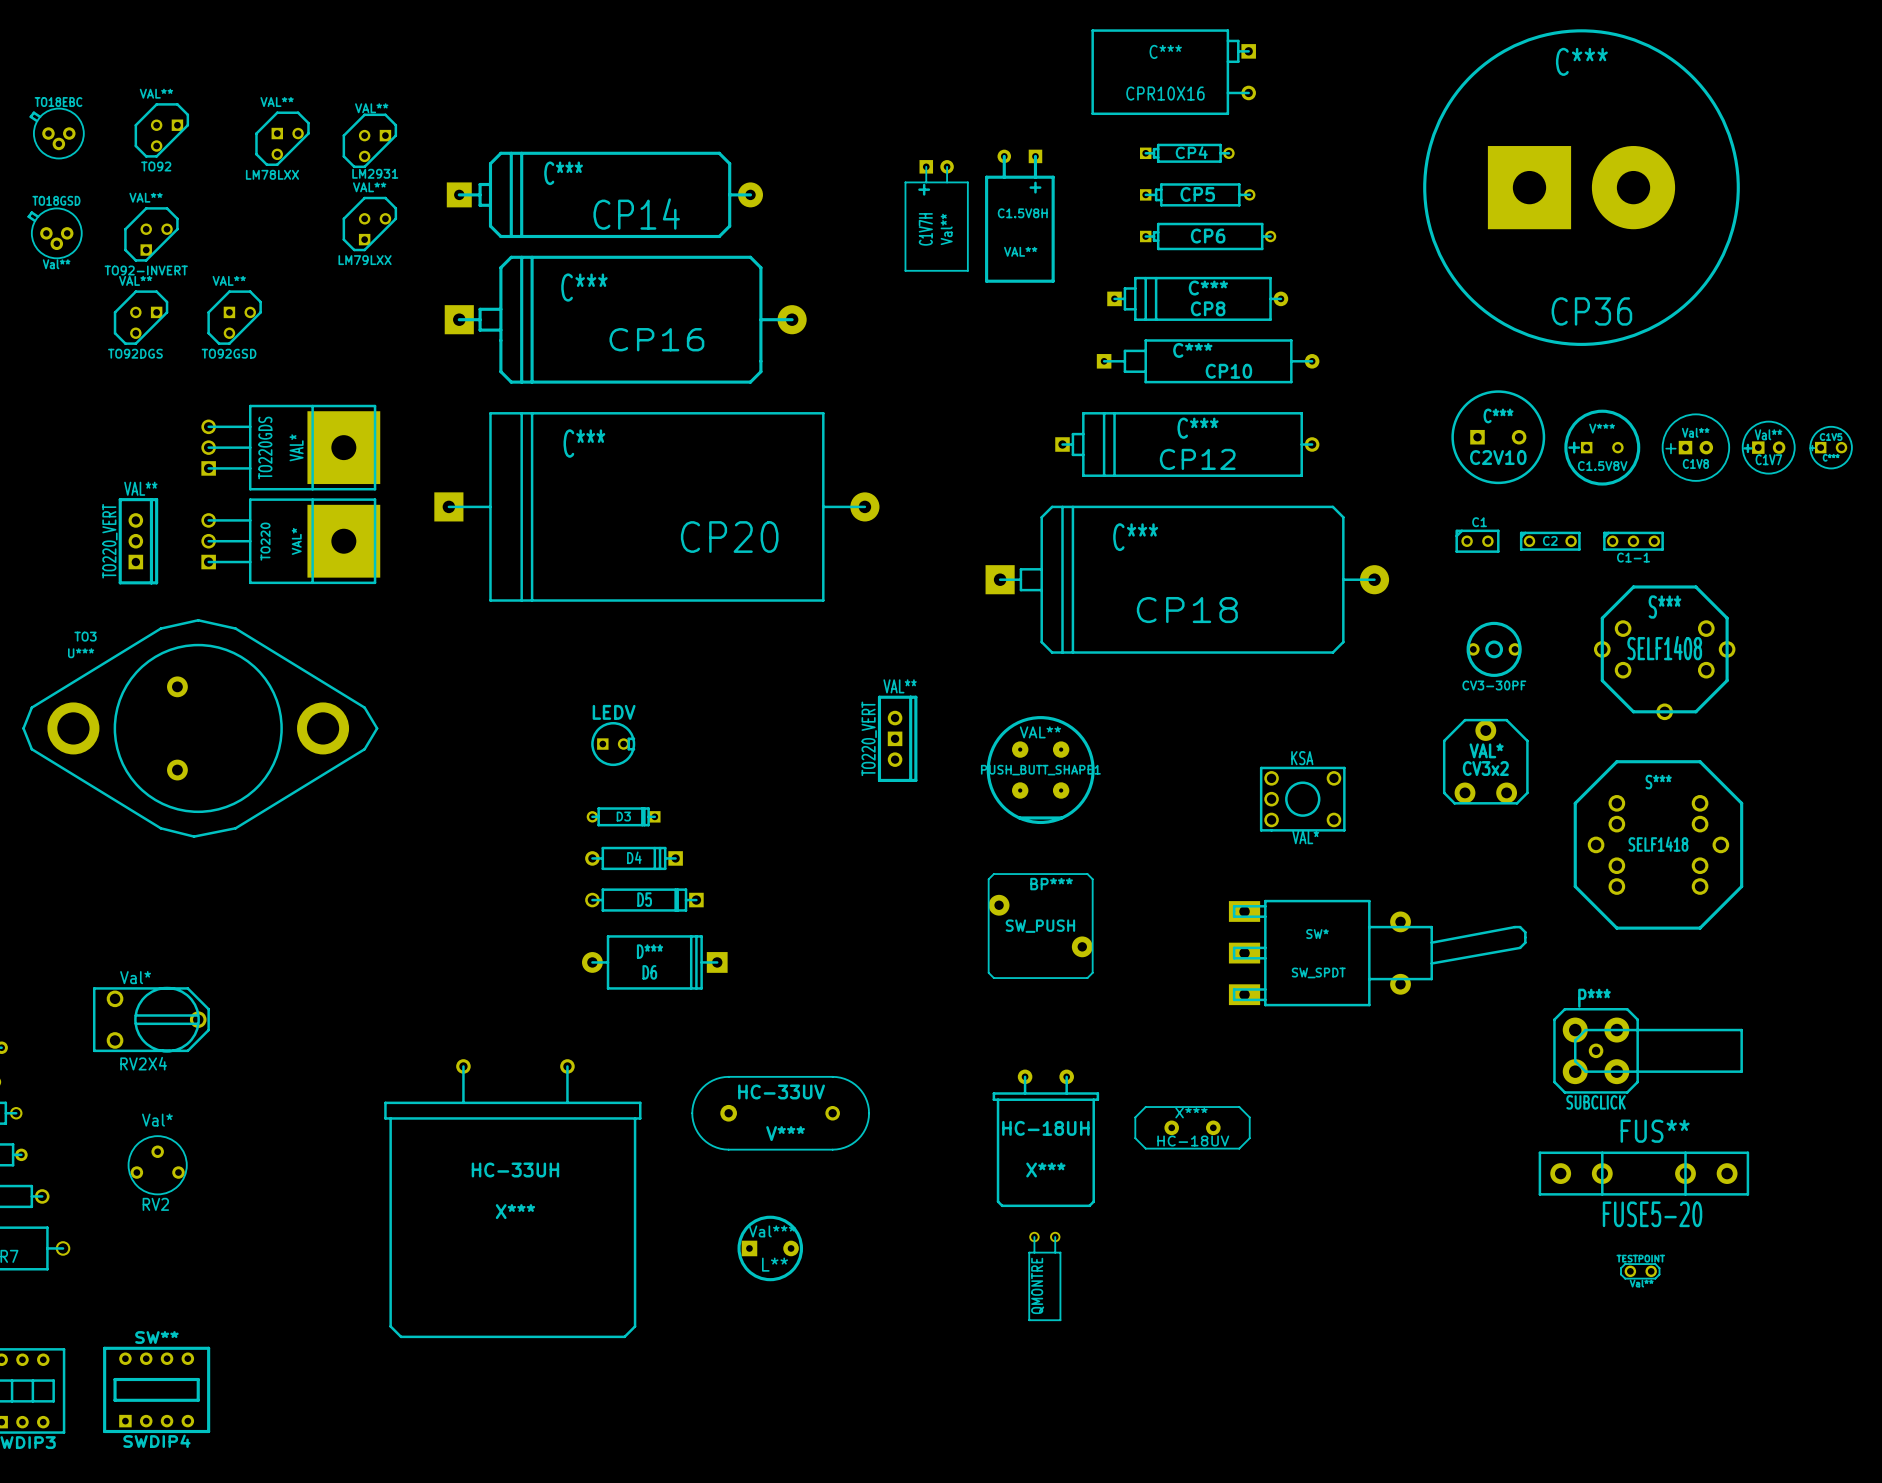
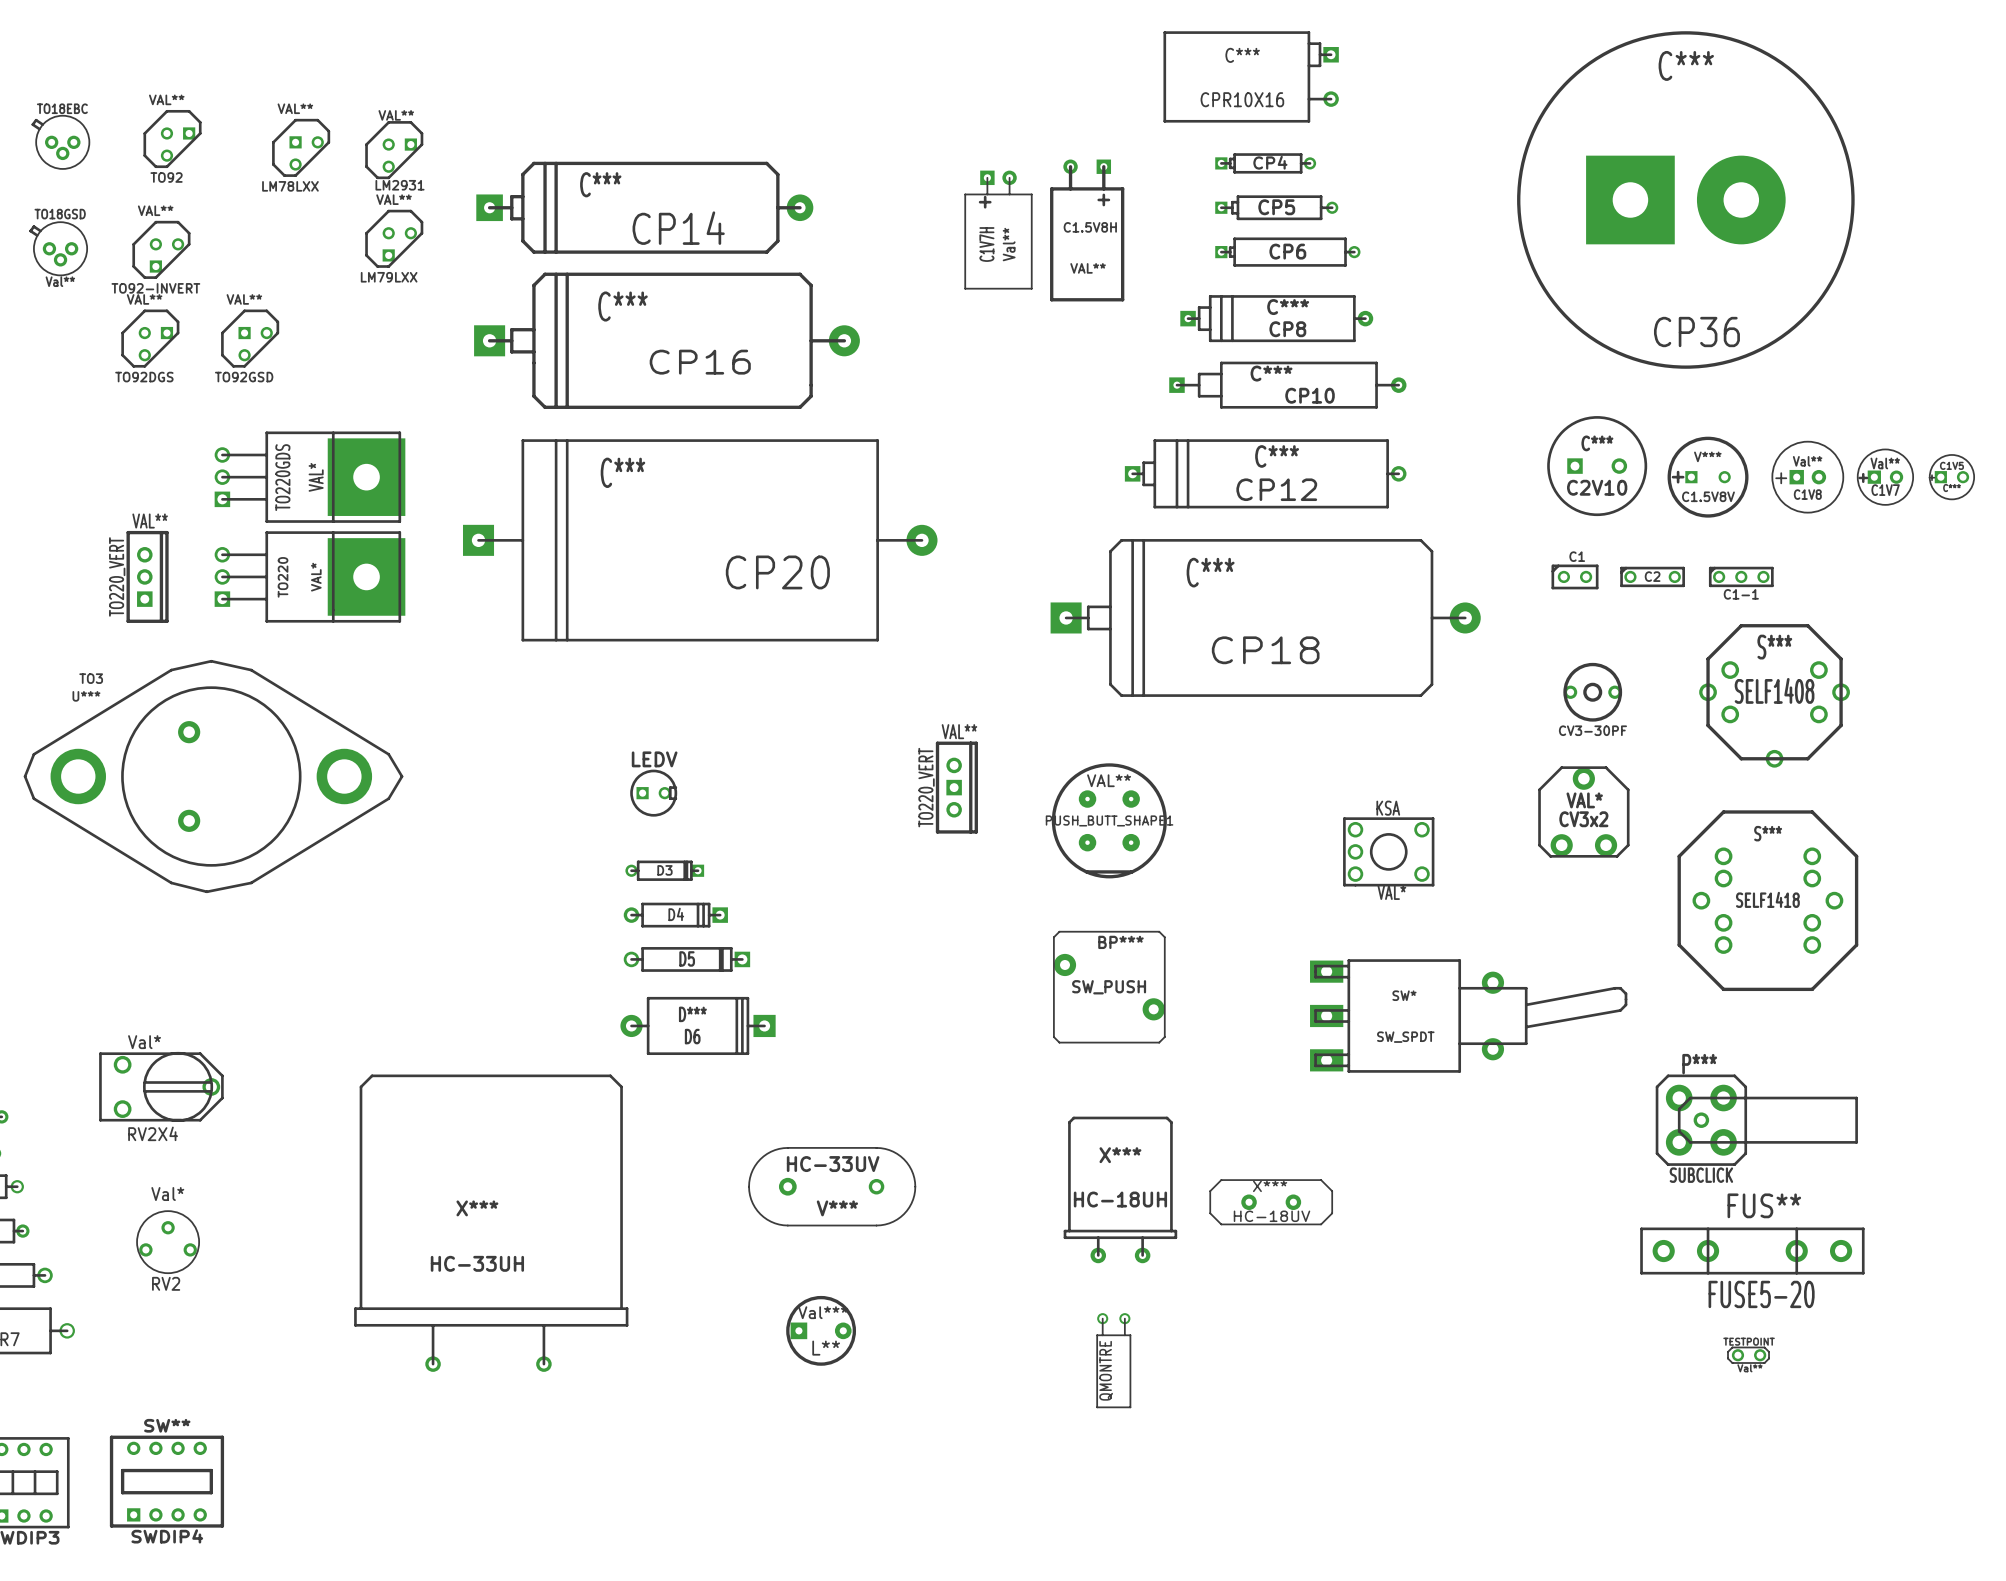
HC-33UV footprint: [691, 1076, 870, 1151] -> [748, 1147, 917, 1227]
HC-18UH rotation: 0° (1045, 1138) -> 180° (1120, 1189)
HC-33UH rotation: 0° (512, 1198) -> 180° (491, 1223)

